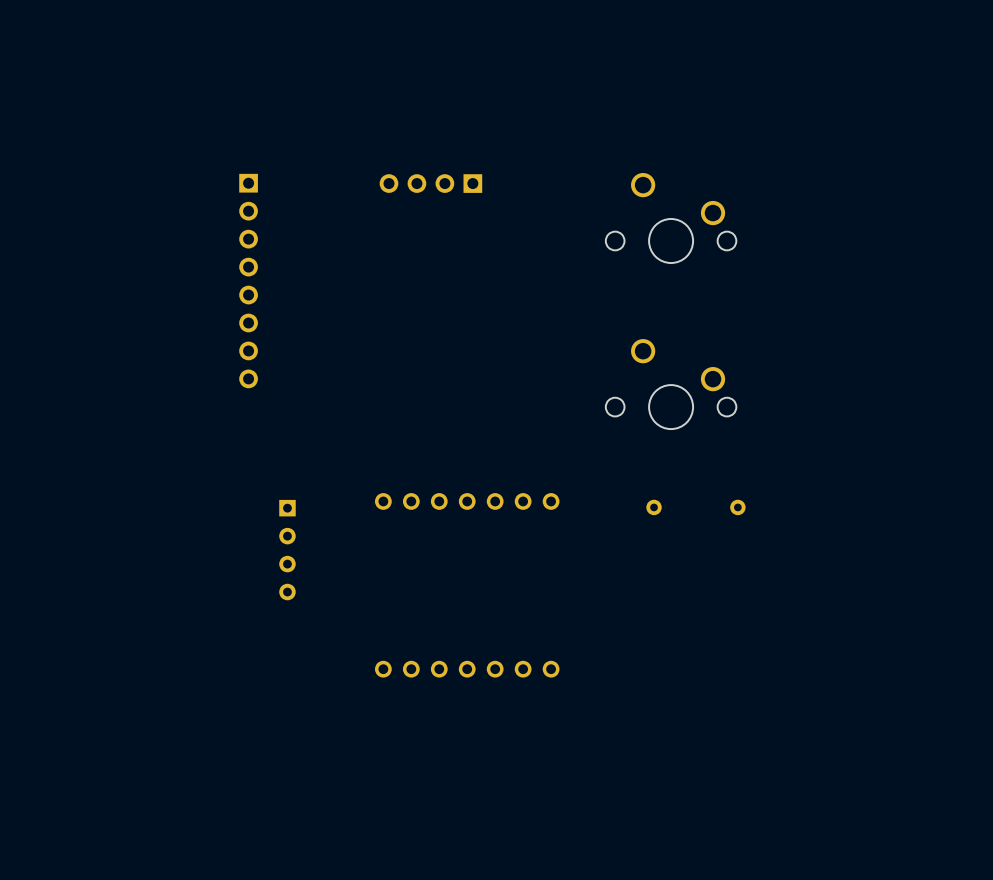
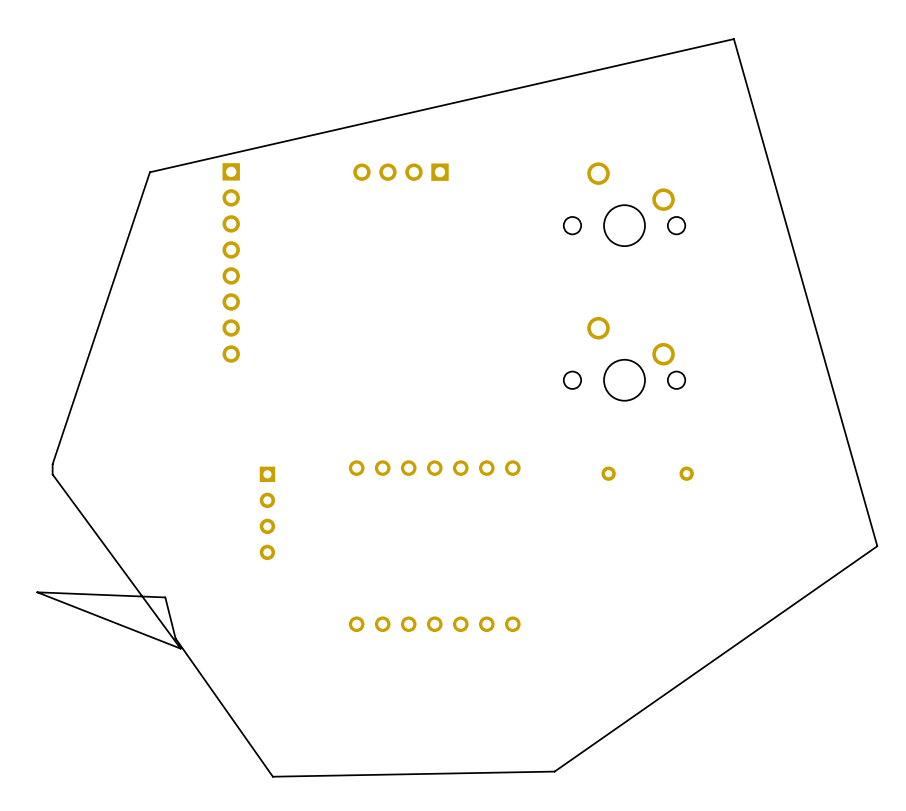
board edge: none -> (733, 39) (877, 546) (554, 771) (272, 776) (175, 638) (165, 597) (37, 592) (180, 648) (52, 474) (52, 464) (149, 172) (733, 39)

